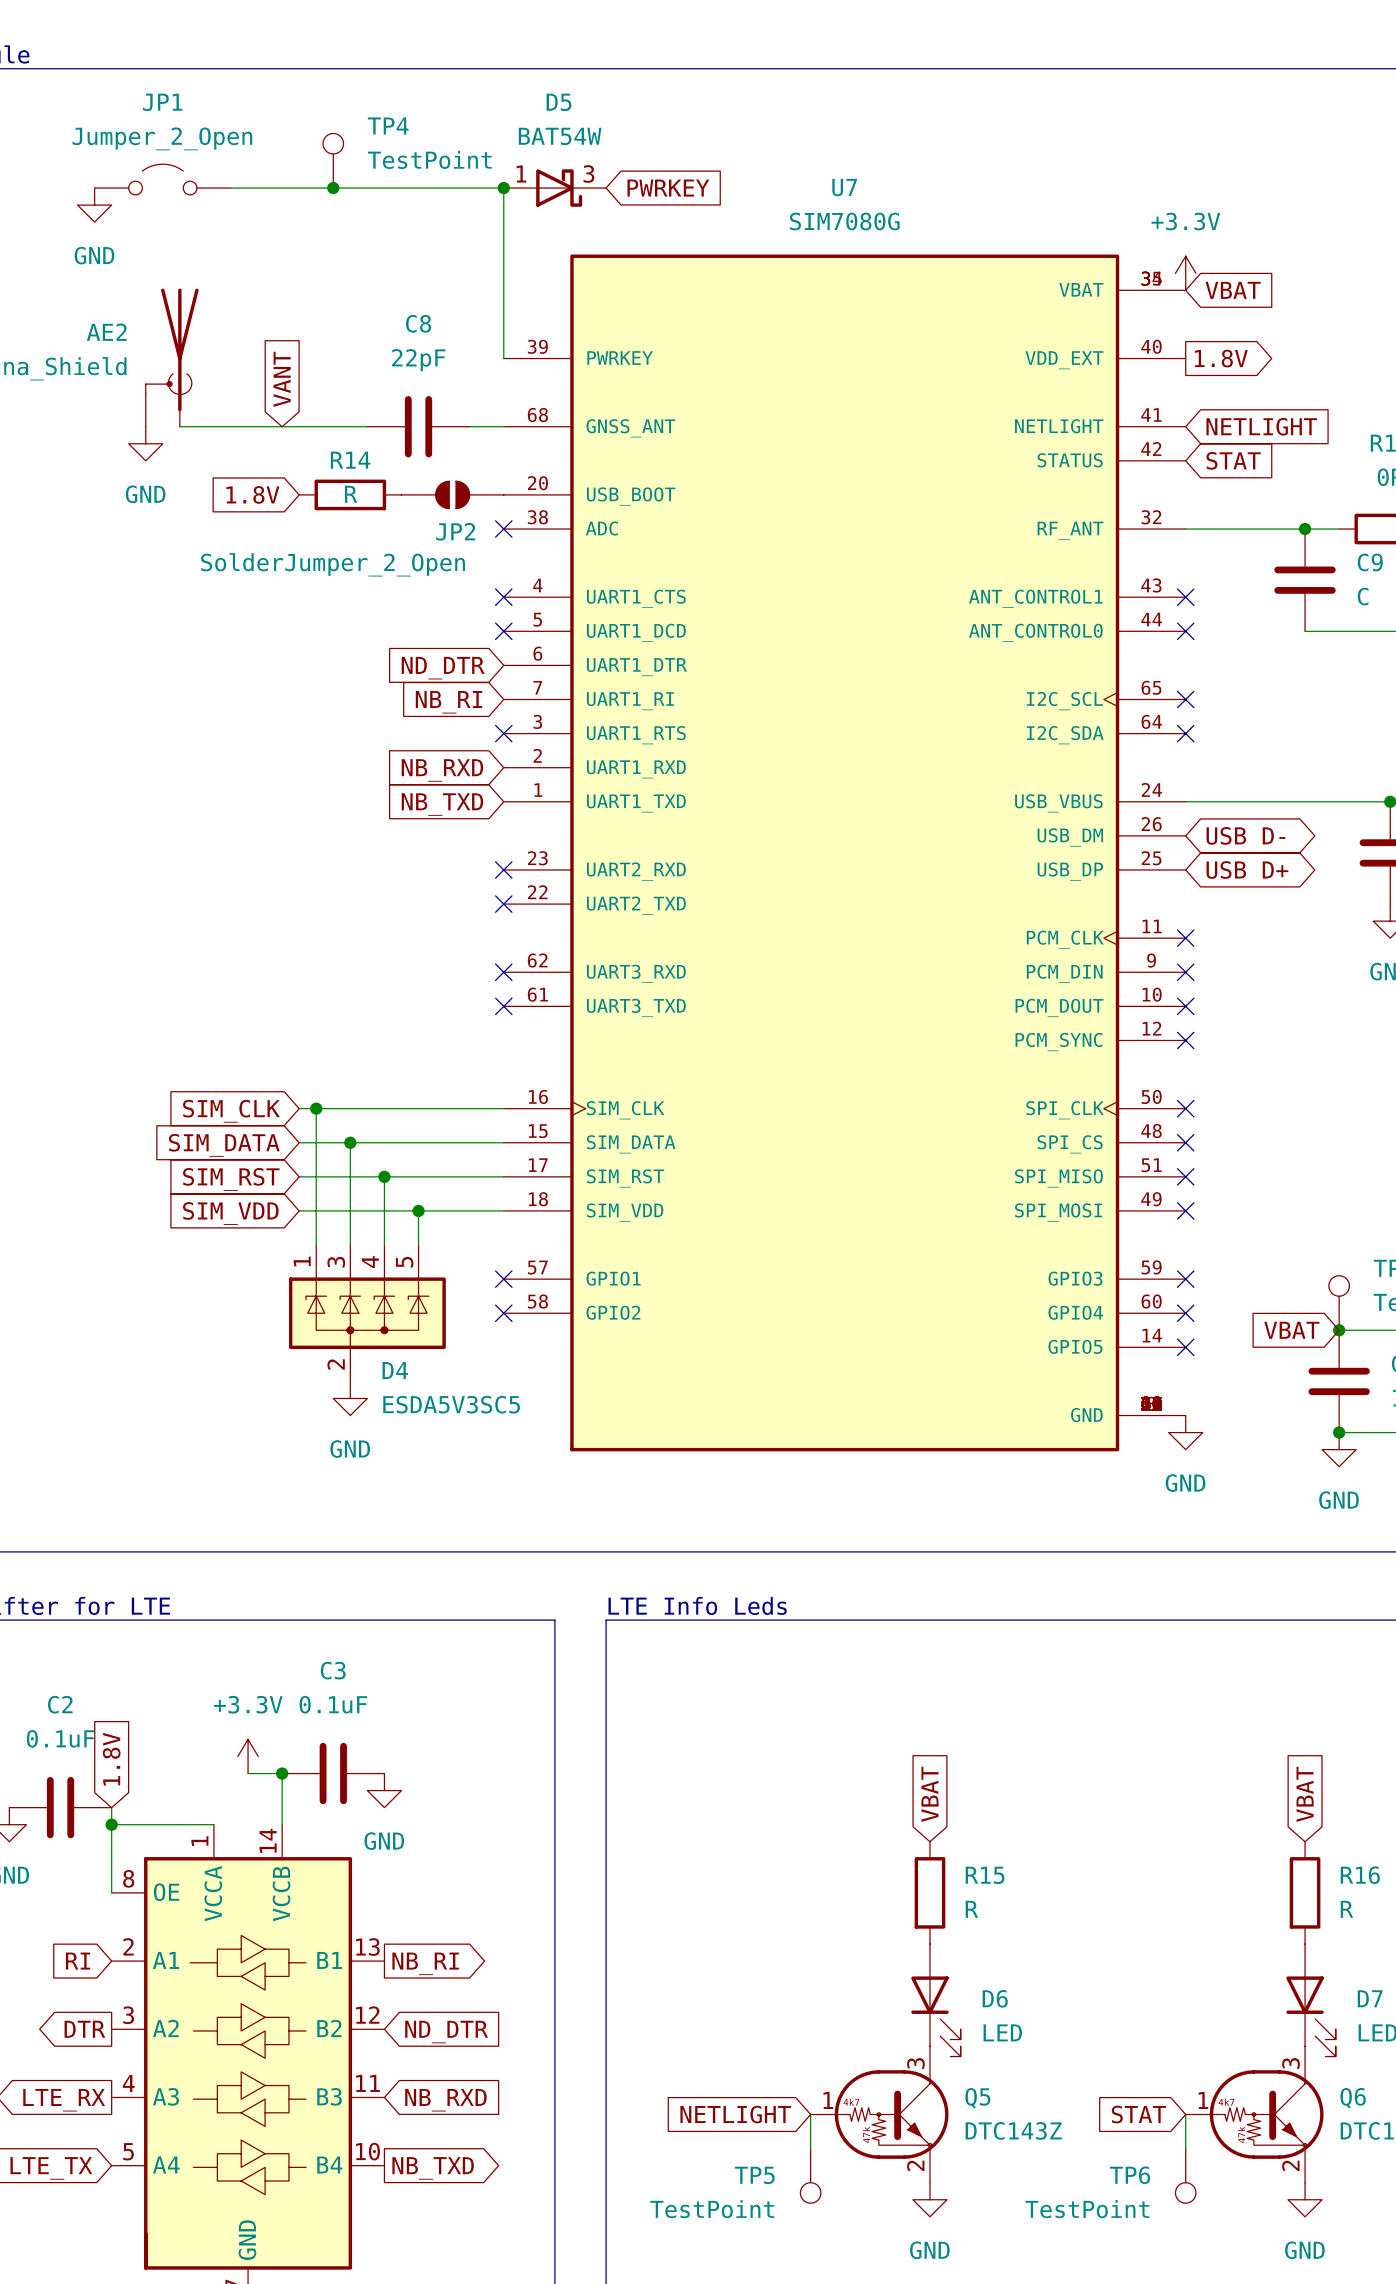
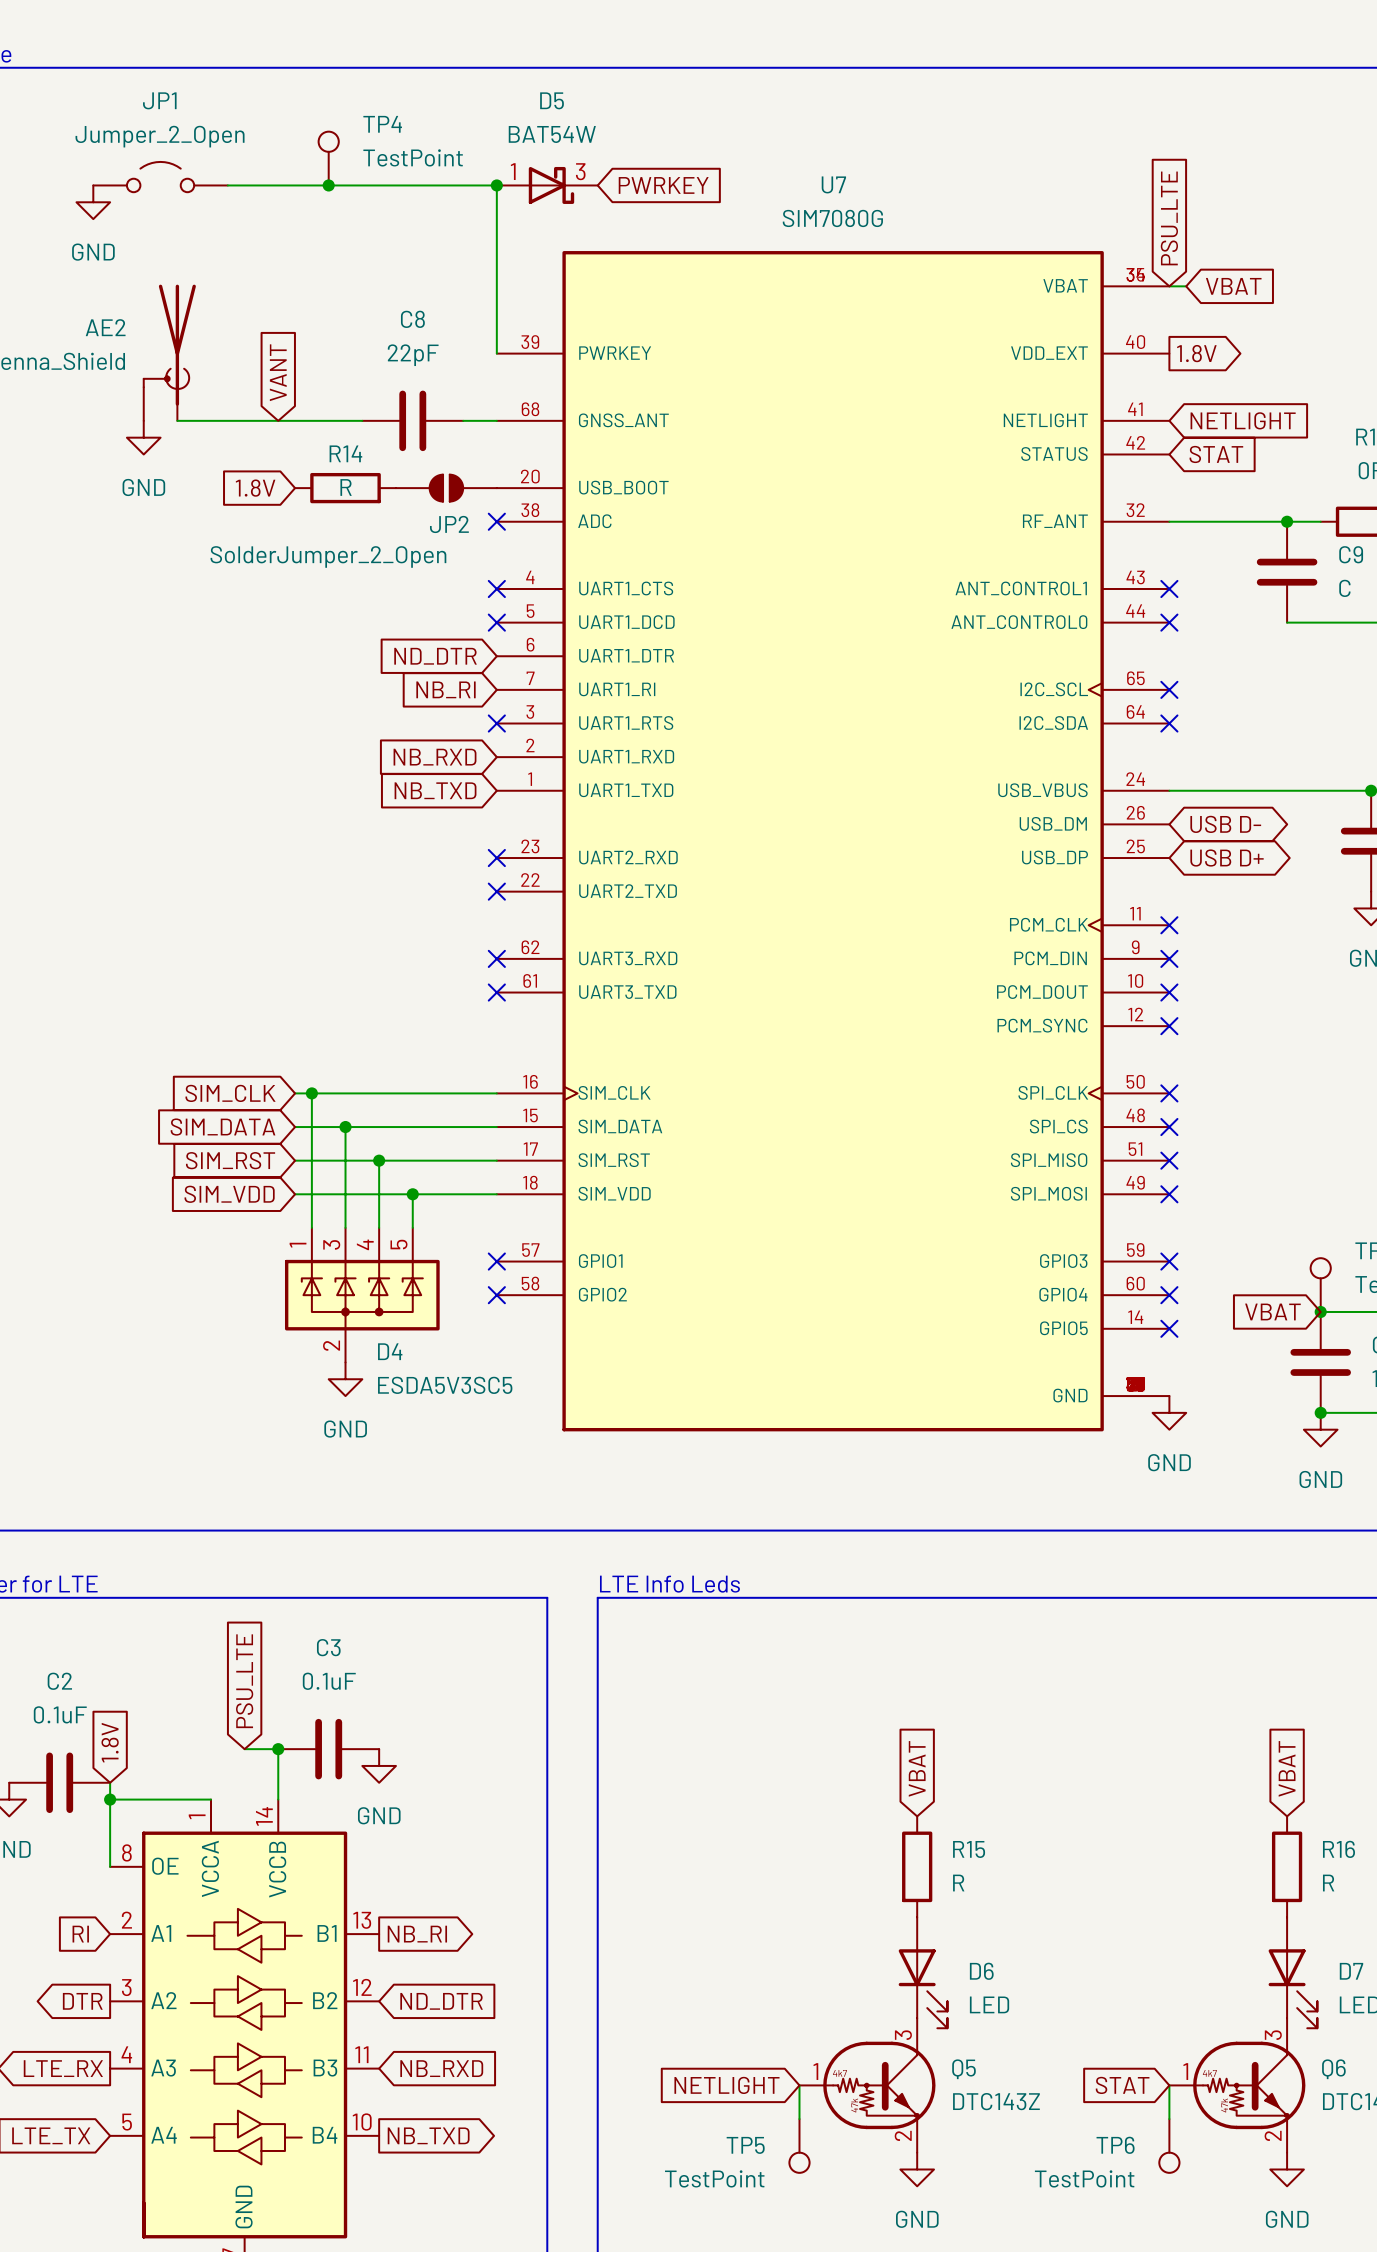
power symbol: +3.3V (1185, 273) -> none
wire: none -> (1169, 286) (1186, 286)
global label: VBAT (1233, 290) -> PSU_LTE (1169, 218)
global label: none -> VBAT (1233, 286)
global label: none -> PSU_LTE (244, 1681)
power symbol: +3.3V (248, 1756) -> none

